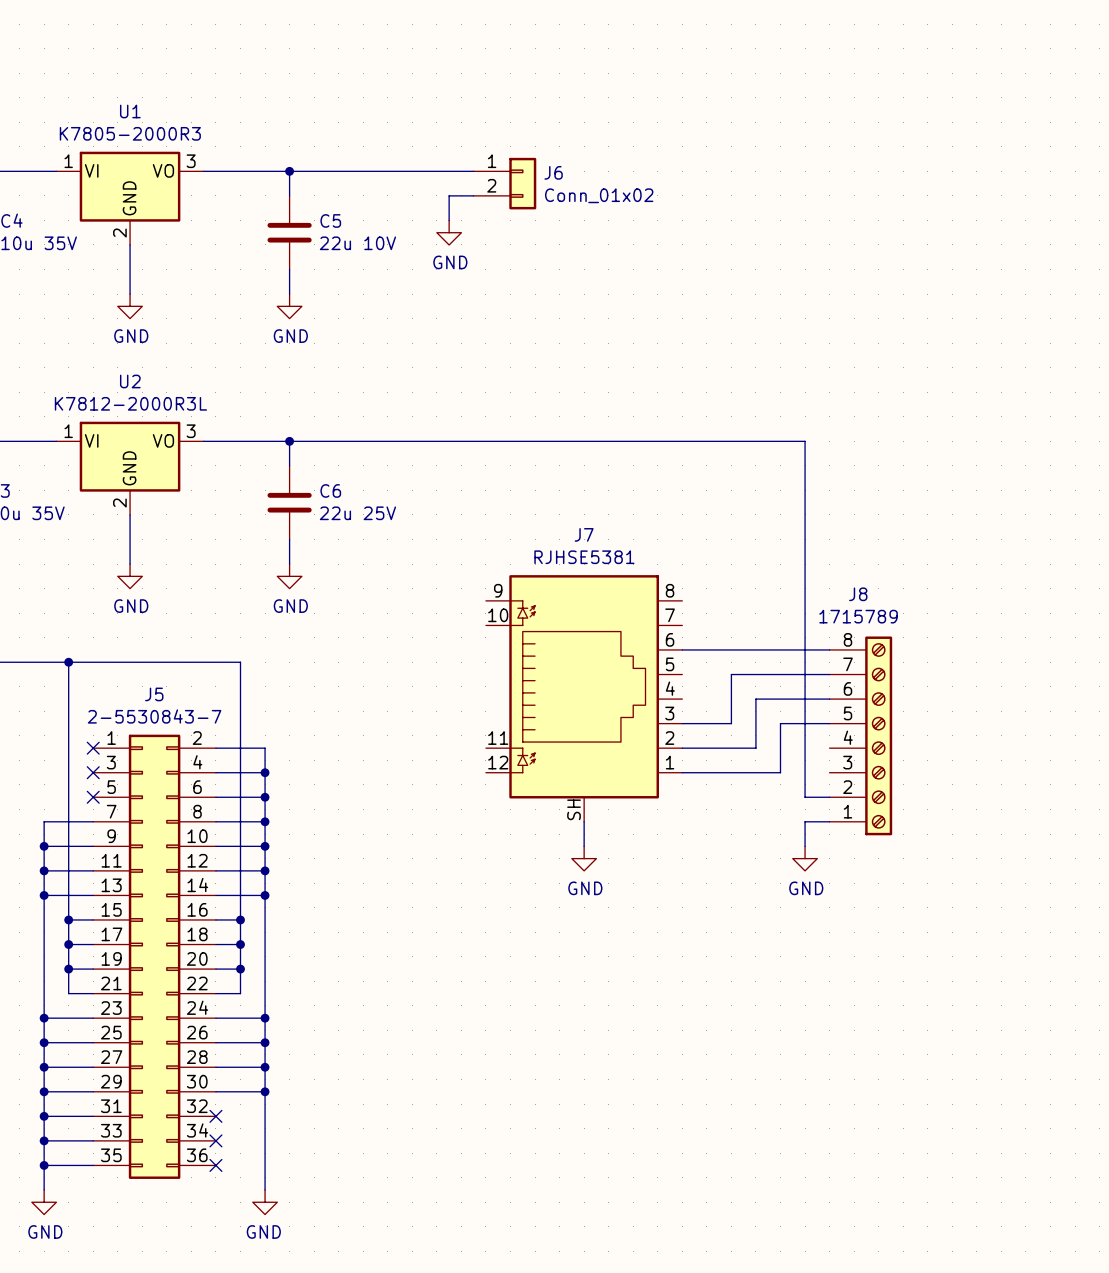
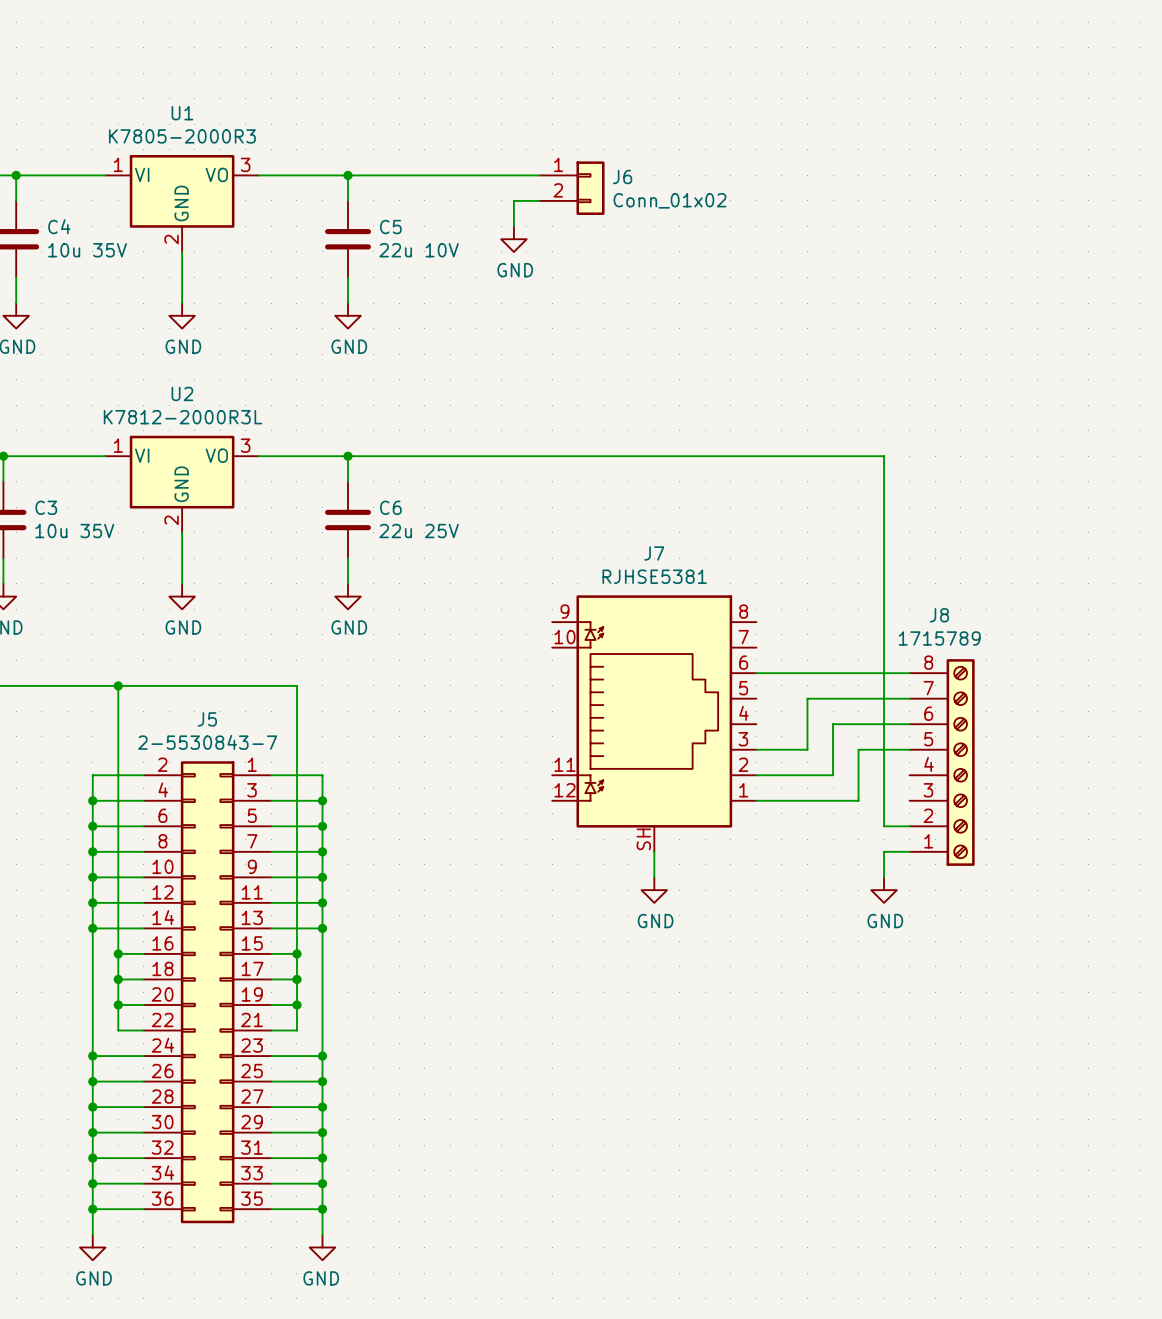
wire: none -> (143, 775) (92, 775) (92, 851)
no-connect mark: (93, 748) -> none
wire: none -> (92, 800) (143, 800)
junction: none -> (92, 800)
no-connect mark: (93, 772) -> none
wire: none -> (92, 826) (143, 826)
junction: none -> (92, 826)
no-connect mark: (93, 797) -> none
junction: none -> (92, 851)
J5 flip: as is (154, 956) -> left-right (207, 992)
wire: none -> (271, 1158) (322, 1158)
no-connect mark: (215, 1116) -> none
junction: none -> (322, 1158)
wire: none -> (271, 1183) (322, 1183)
no-connect mark: (215, 1140) -> none
junction: none -> (322, 1183)
wire: none -> (271, 1209) (322, 1209)
no-connect mark: (215, 1165) -> none
junction: none -> (322, 1209)

